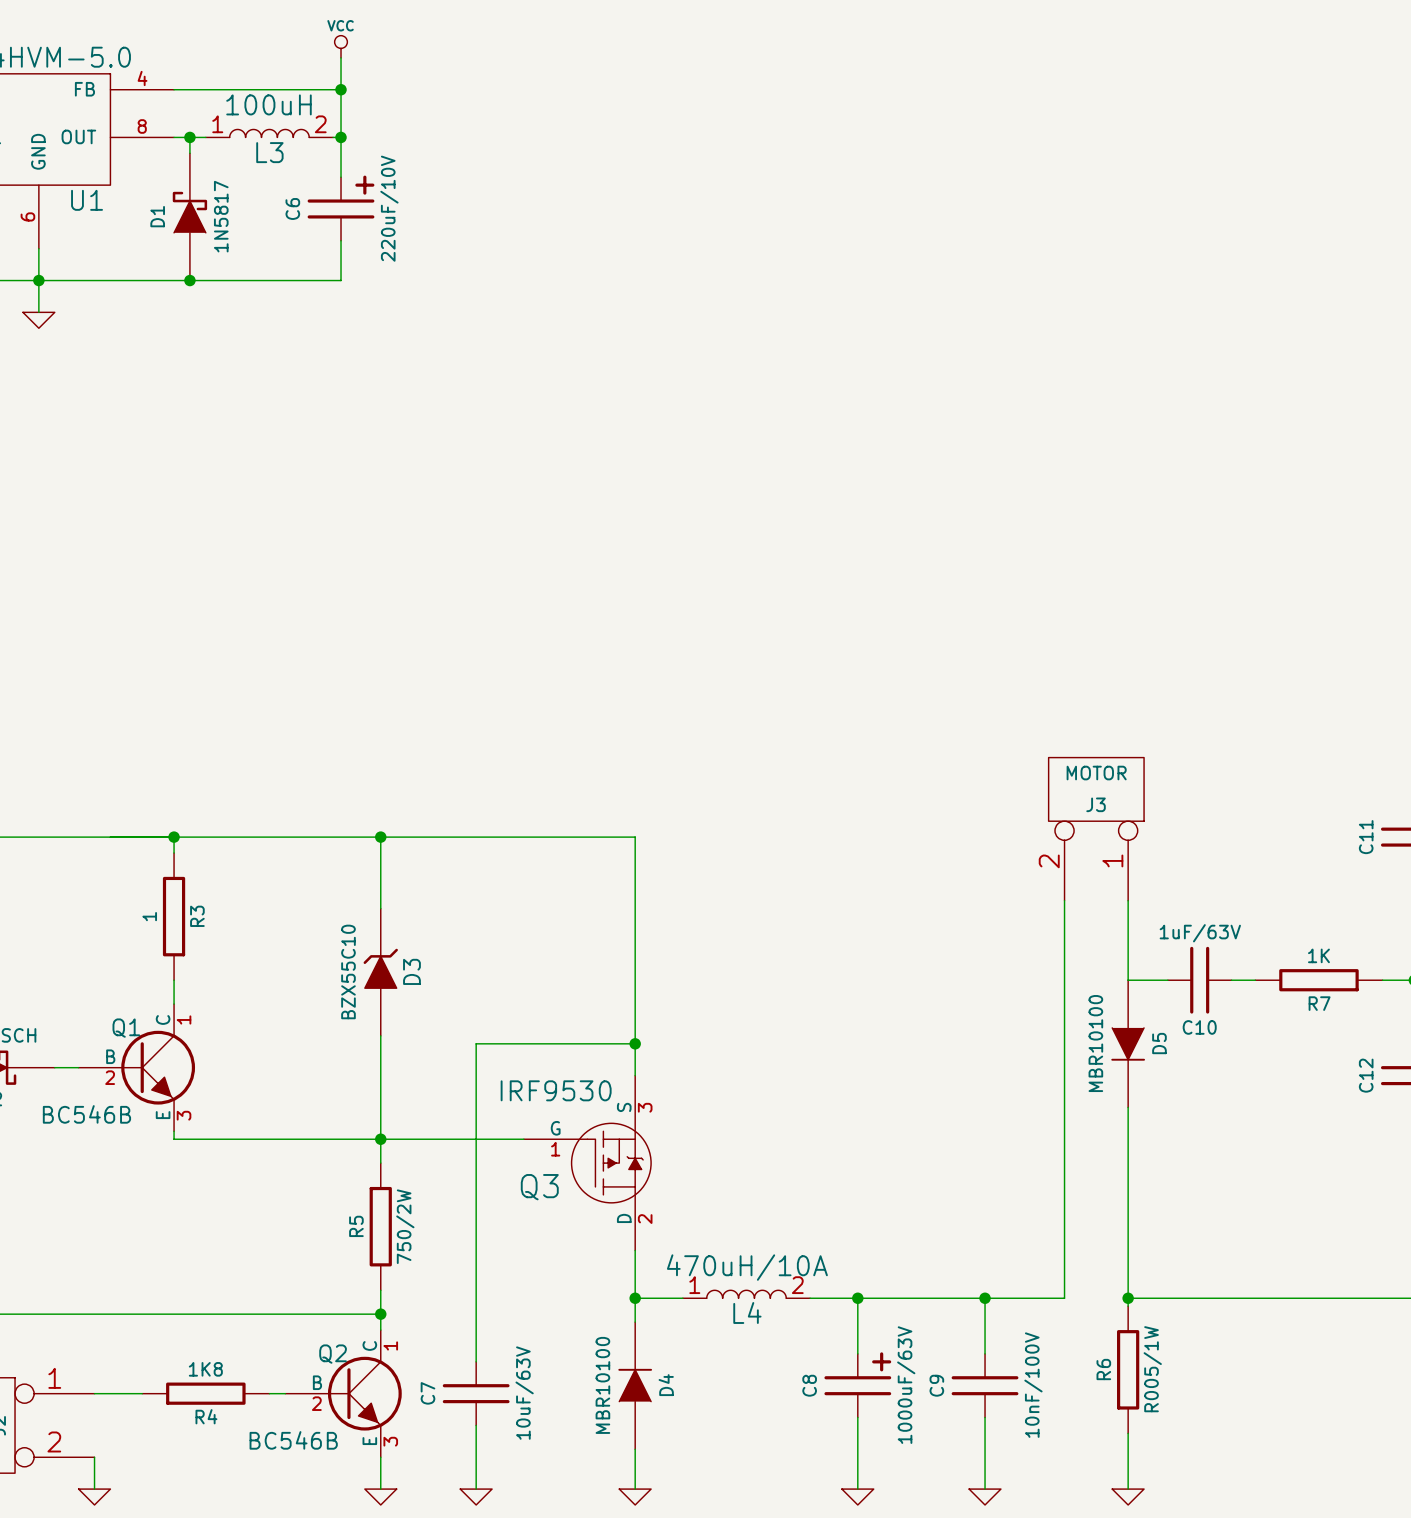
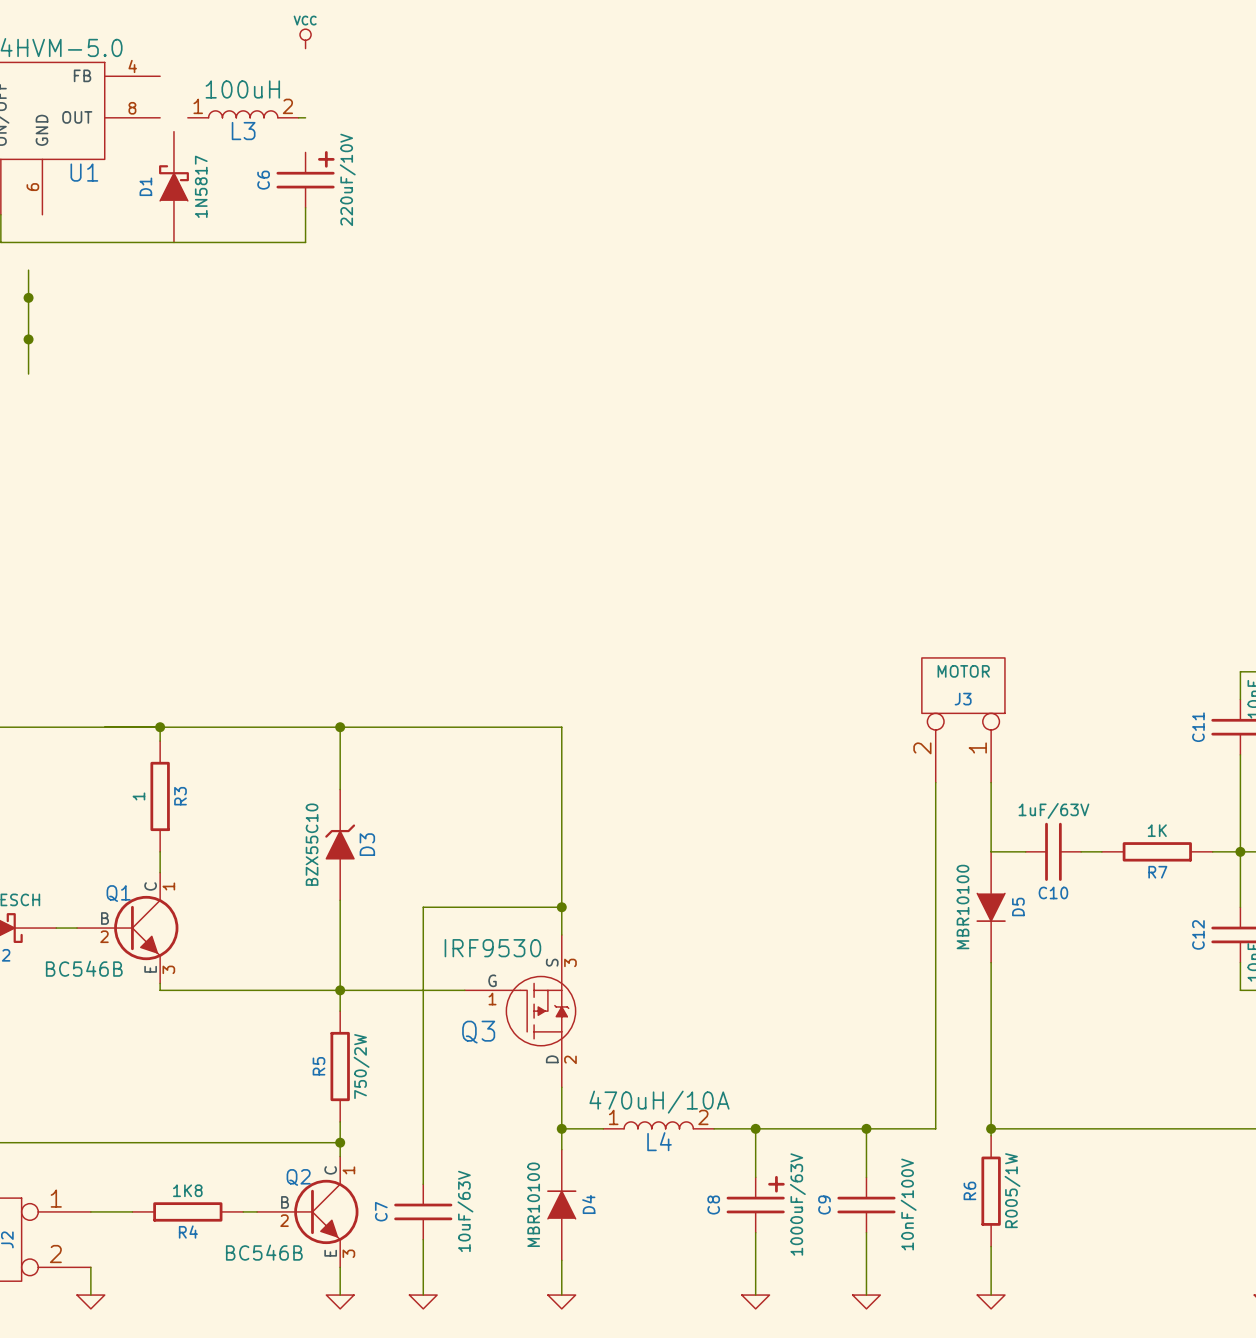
wire: (341, 57) (341, 177) -> none
wire: (174, 89) (341, 89) -> none
junction: (341, 89) -> none
wire: (174, 137) (205, 137) -> none
wire: (189, 137) (189, 153) -> none
junction: (189, 137) -> none
junction: (341, 137) -> none
wire: (38, 248) (38, 312) -> none
junction: (38, 280) -> none
junction: (189, 280) -> none
wire: none -> (28, 270) (28, 374)
power symbol: (38, 320) -> none
junction: none -> (28, 297)
junction: none -> (28, 339)

